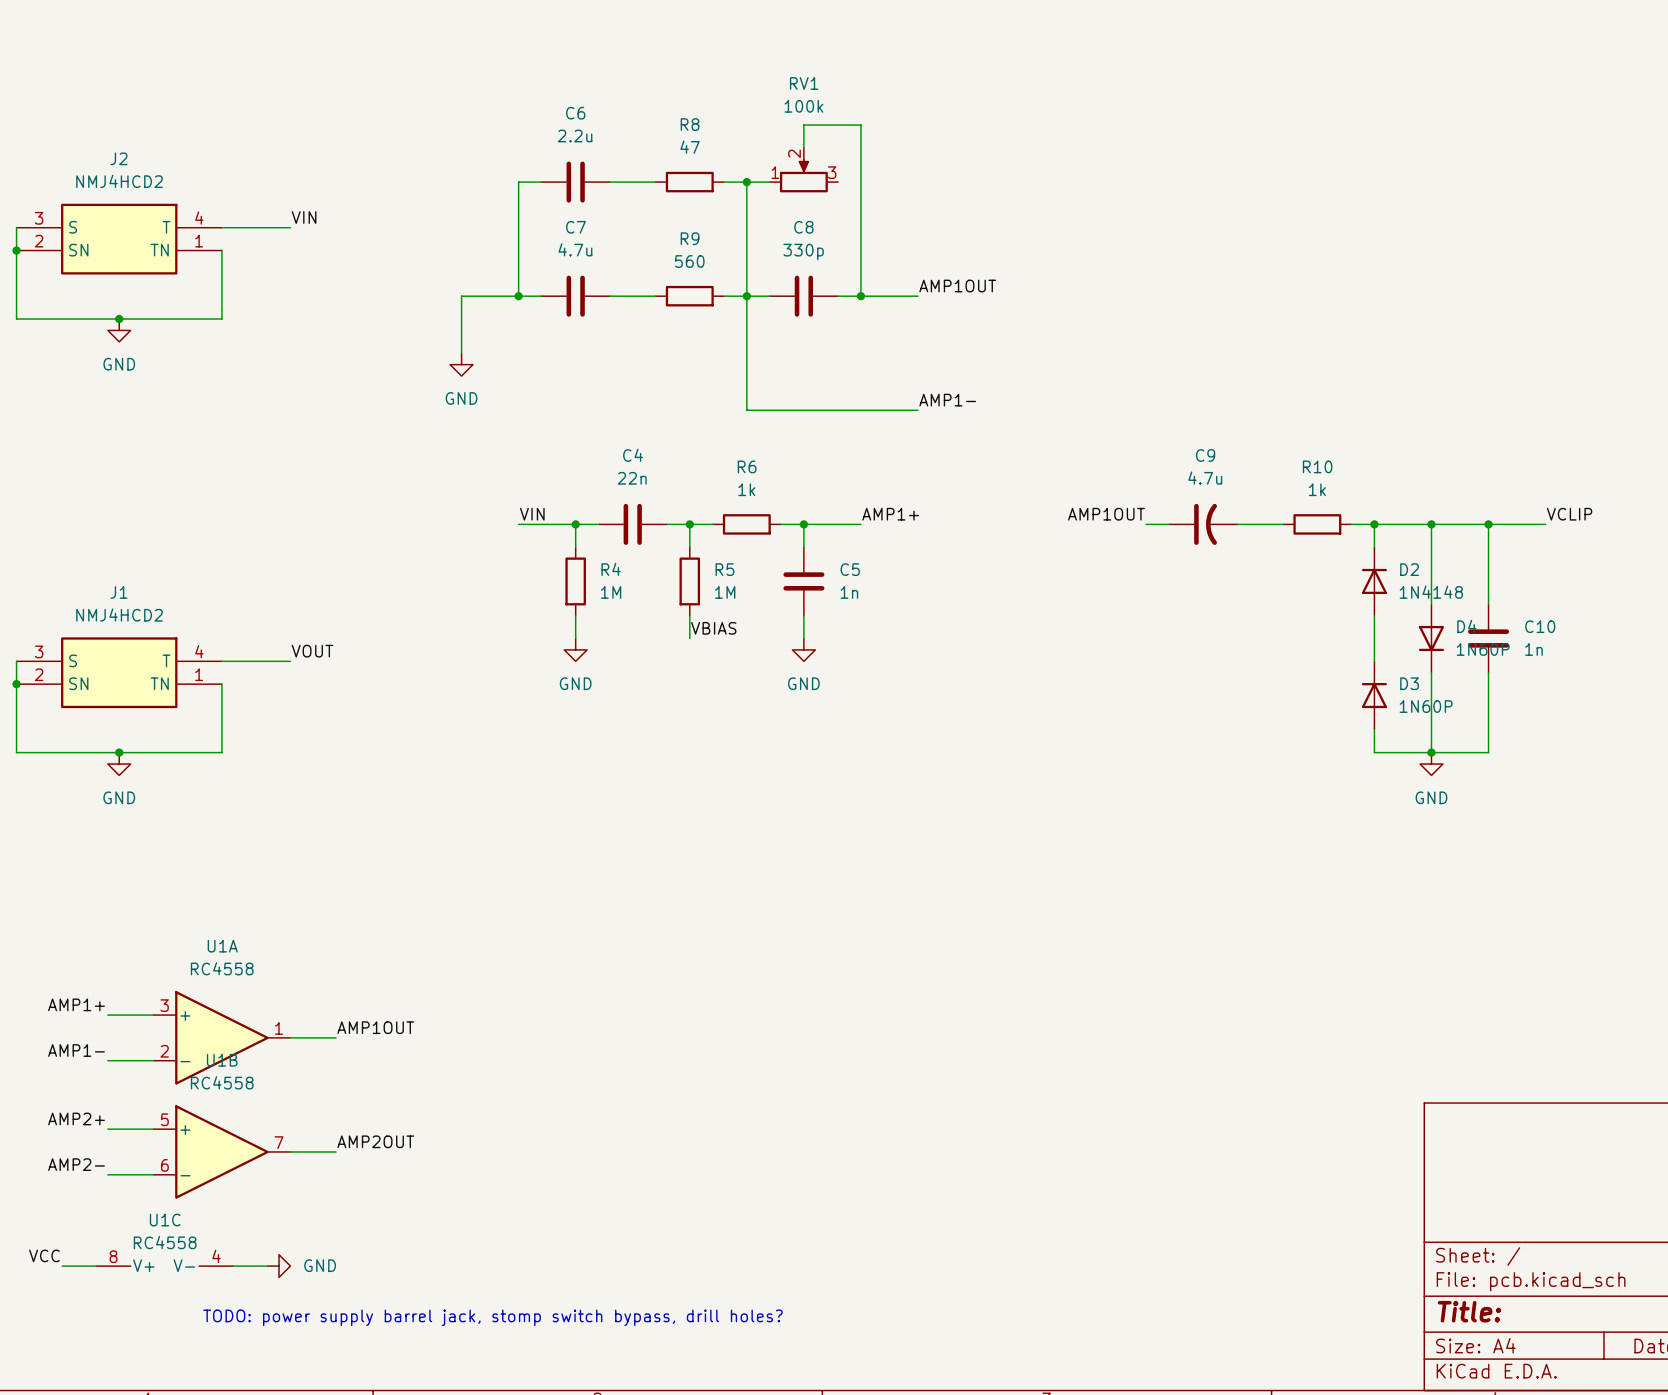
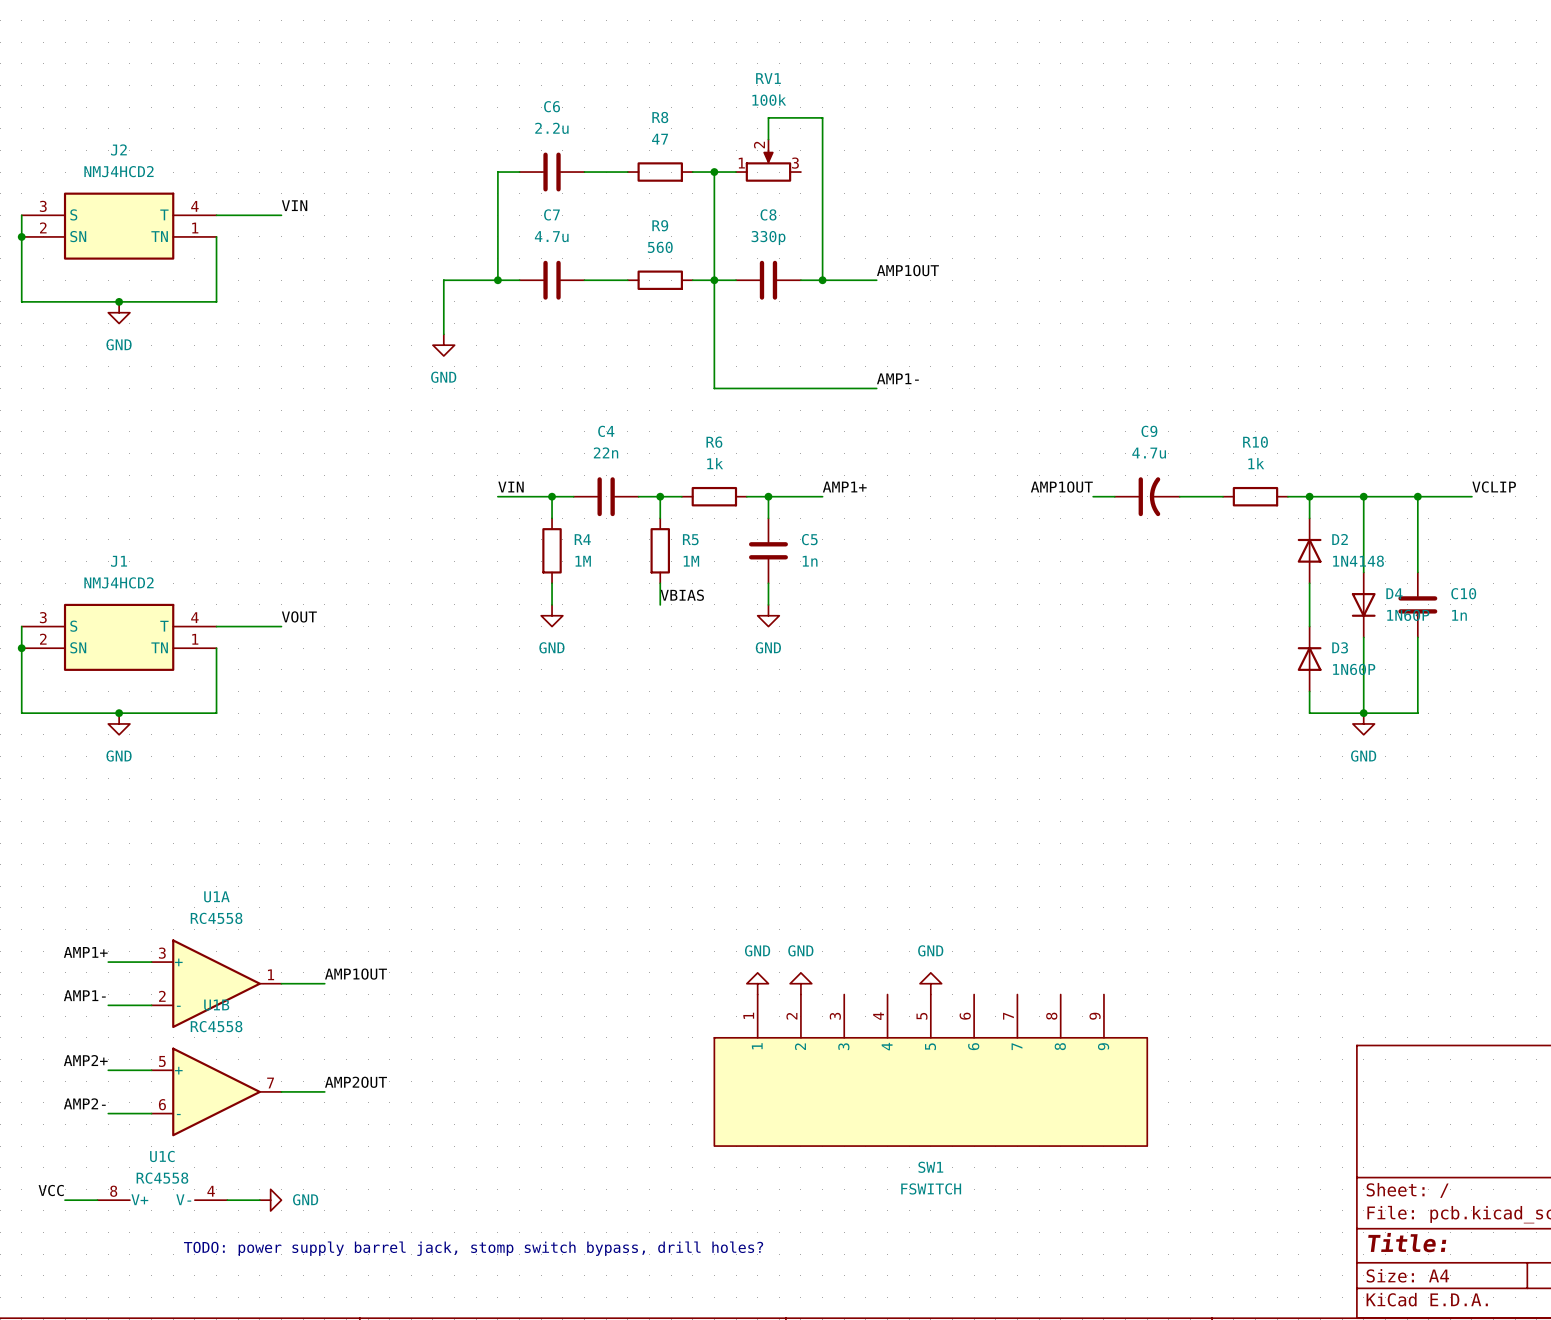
power symbol: none -> GND (757, 983)
power symbol: none -> GND (800, 983)
power symbol: none -> GND (930, 983)
SW1: none -> FSWITCH (930, 1070)

